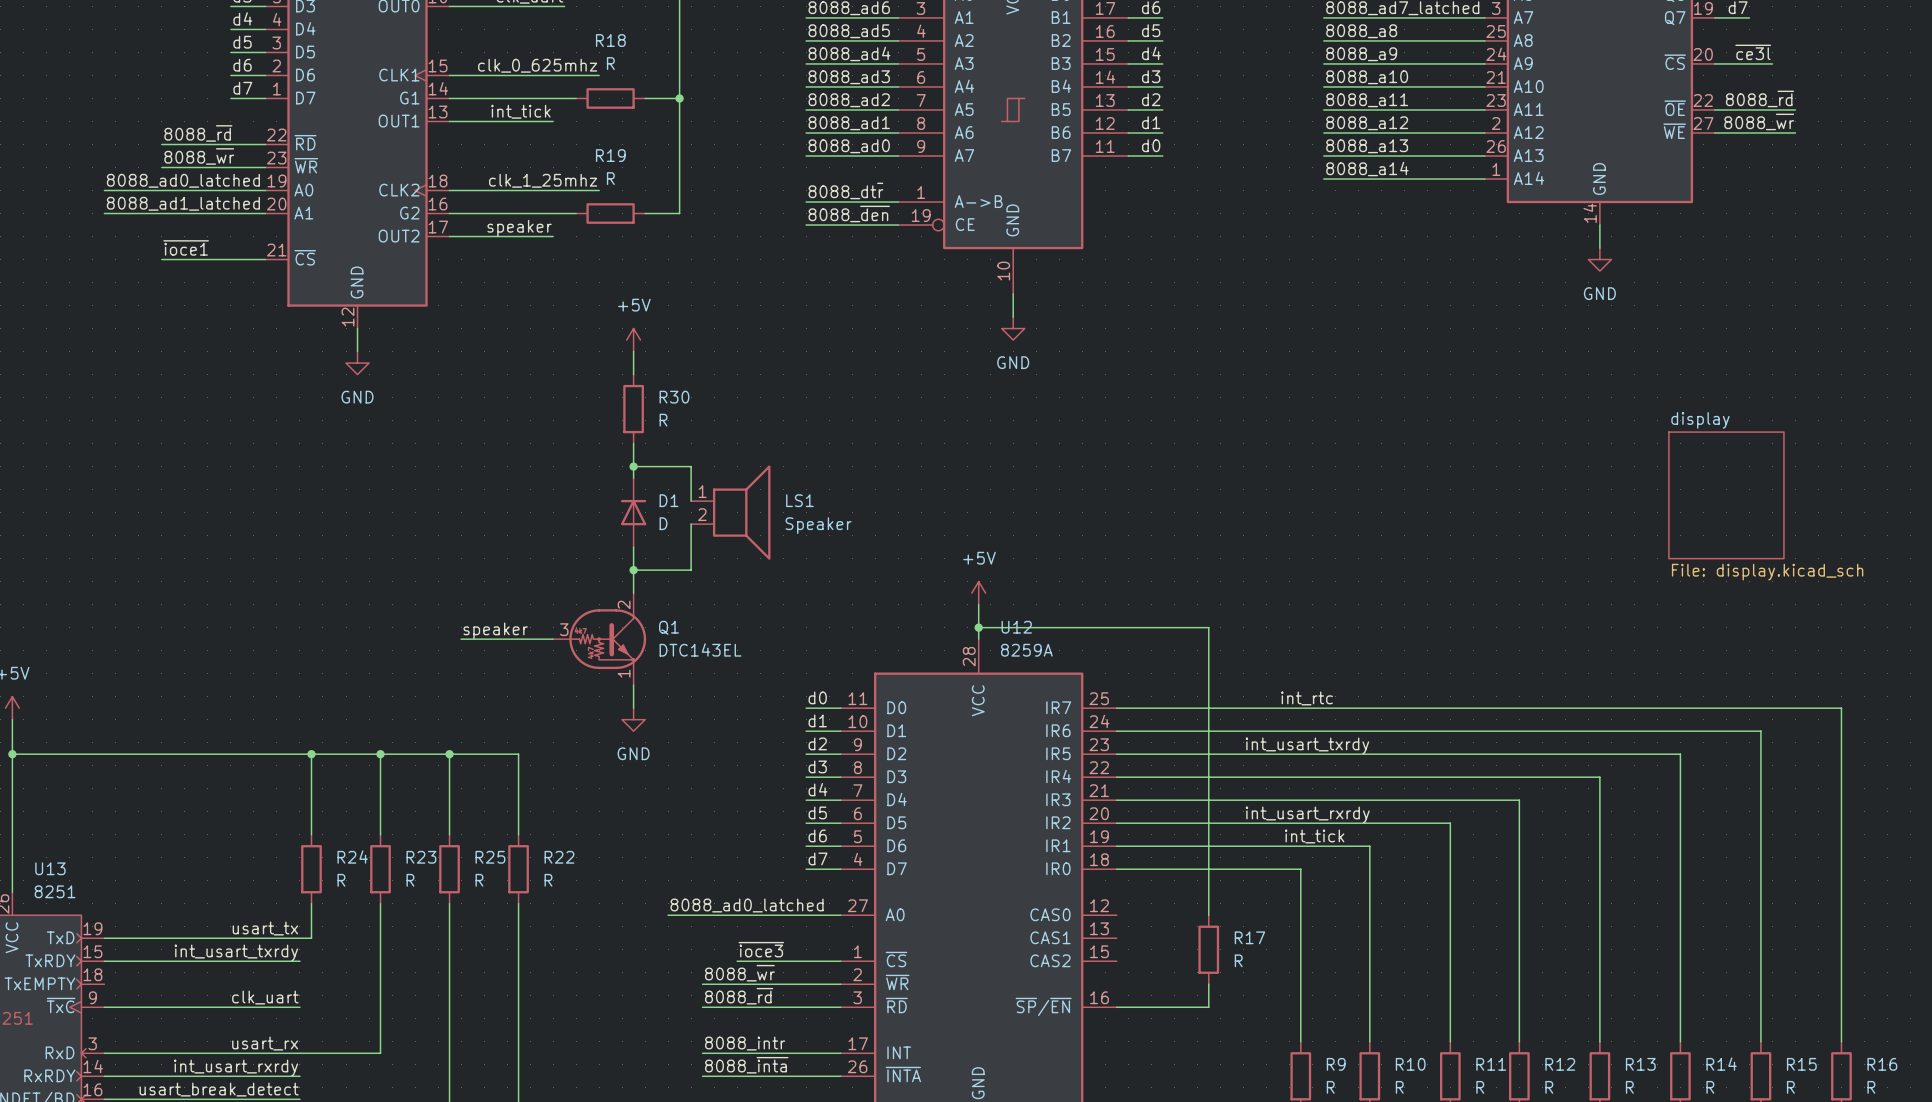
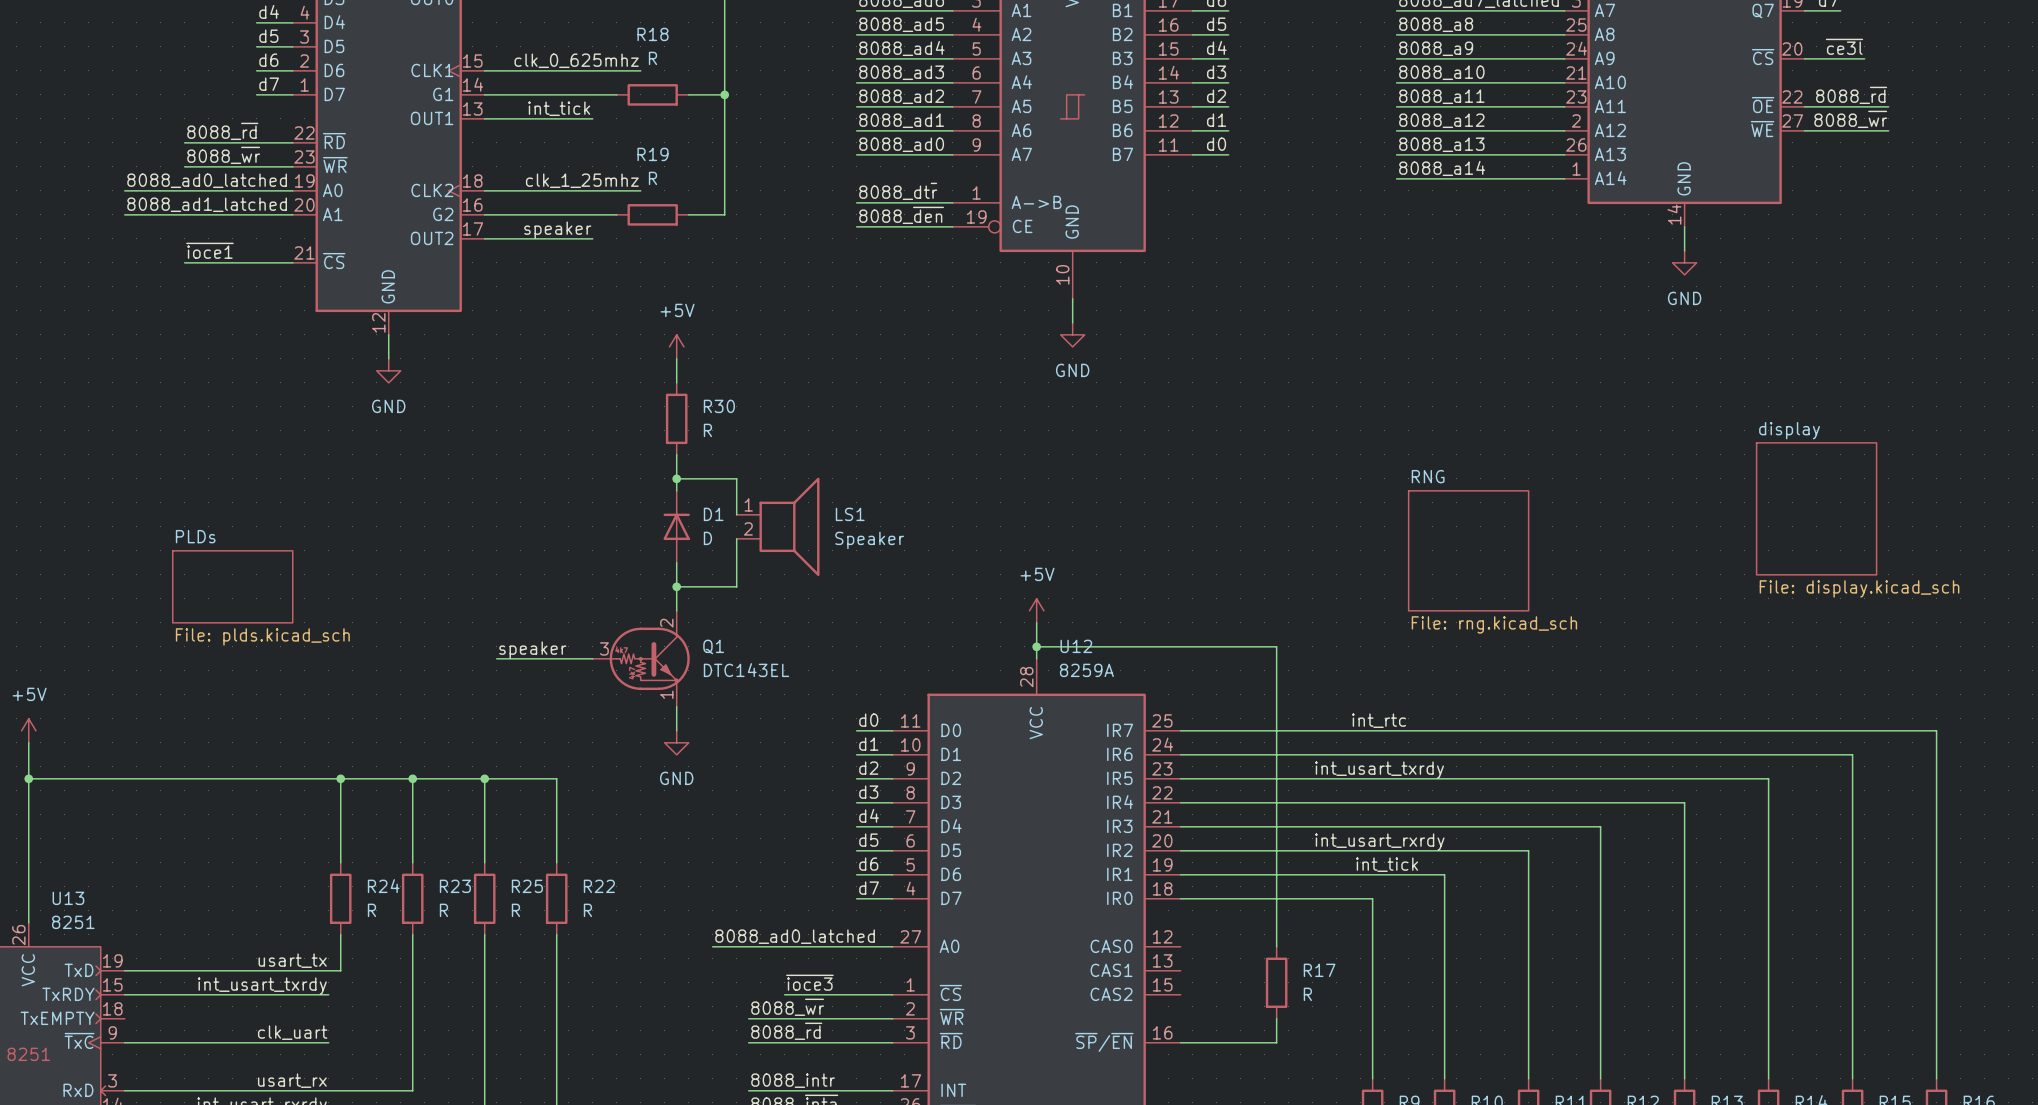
sheet RNG: none -> File: rng.kicad_sch (1468, 550)
sheet PLDs: none -> File: plds.kicad_sch (232, 586)

